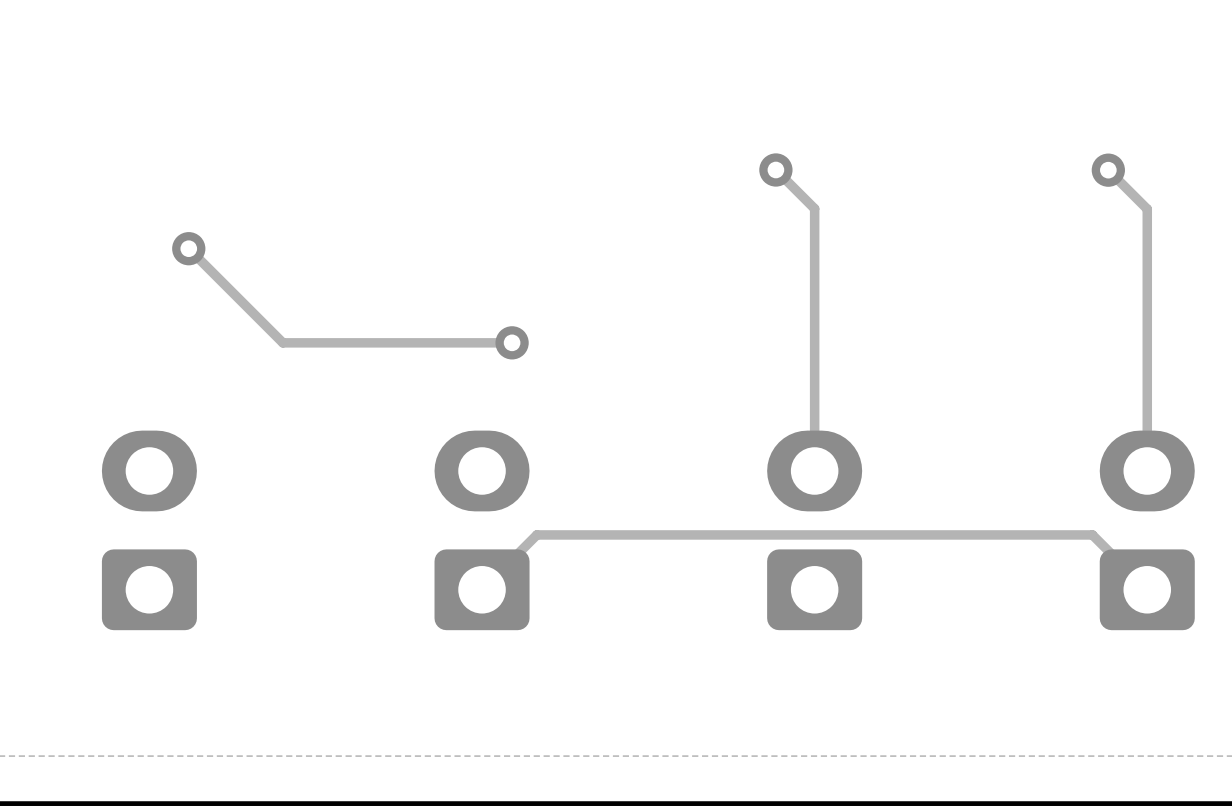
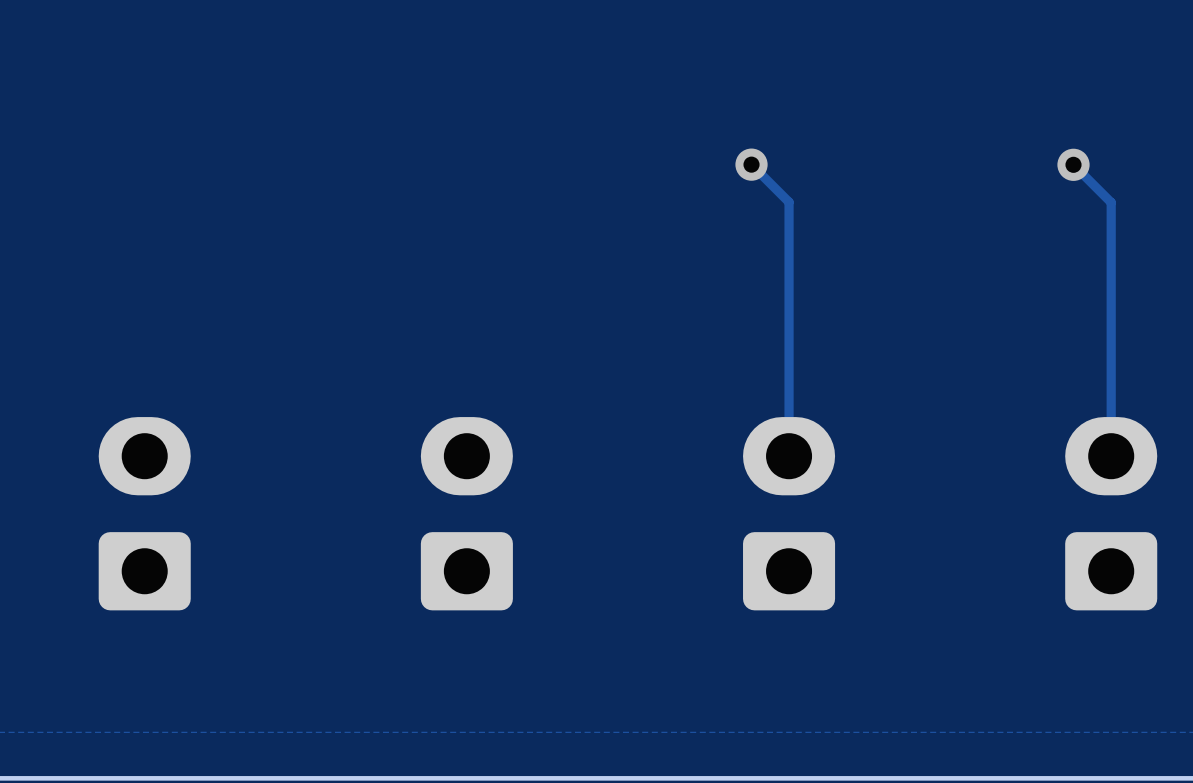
track: (188, 248) (282, 342) (512, 342) -> none
via: (188, 248) -> none
via: (512, 342) -> none
track: (1147, 589) (1092, 534) (536, 534) (482, 589) -> none

